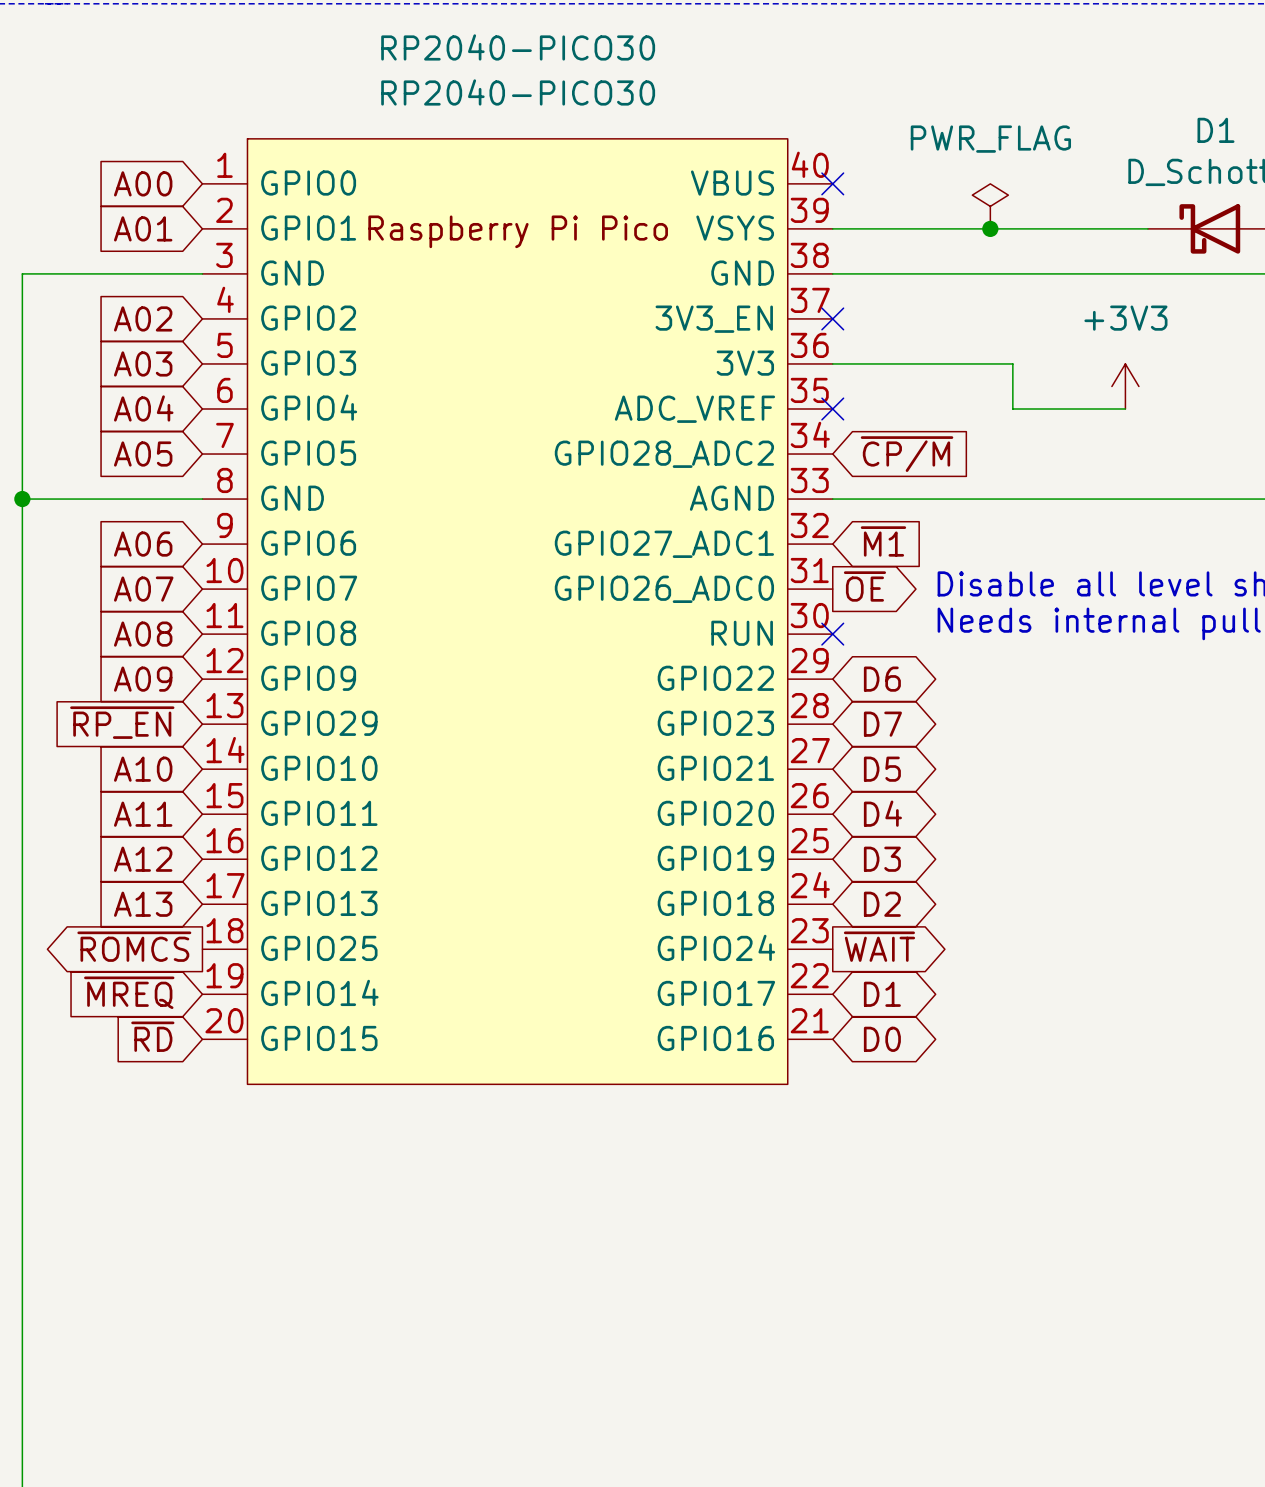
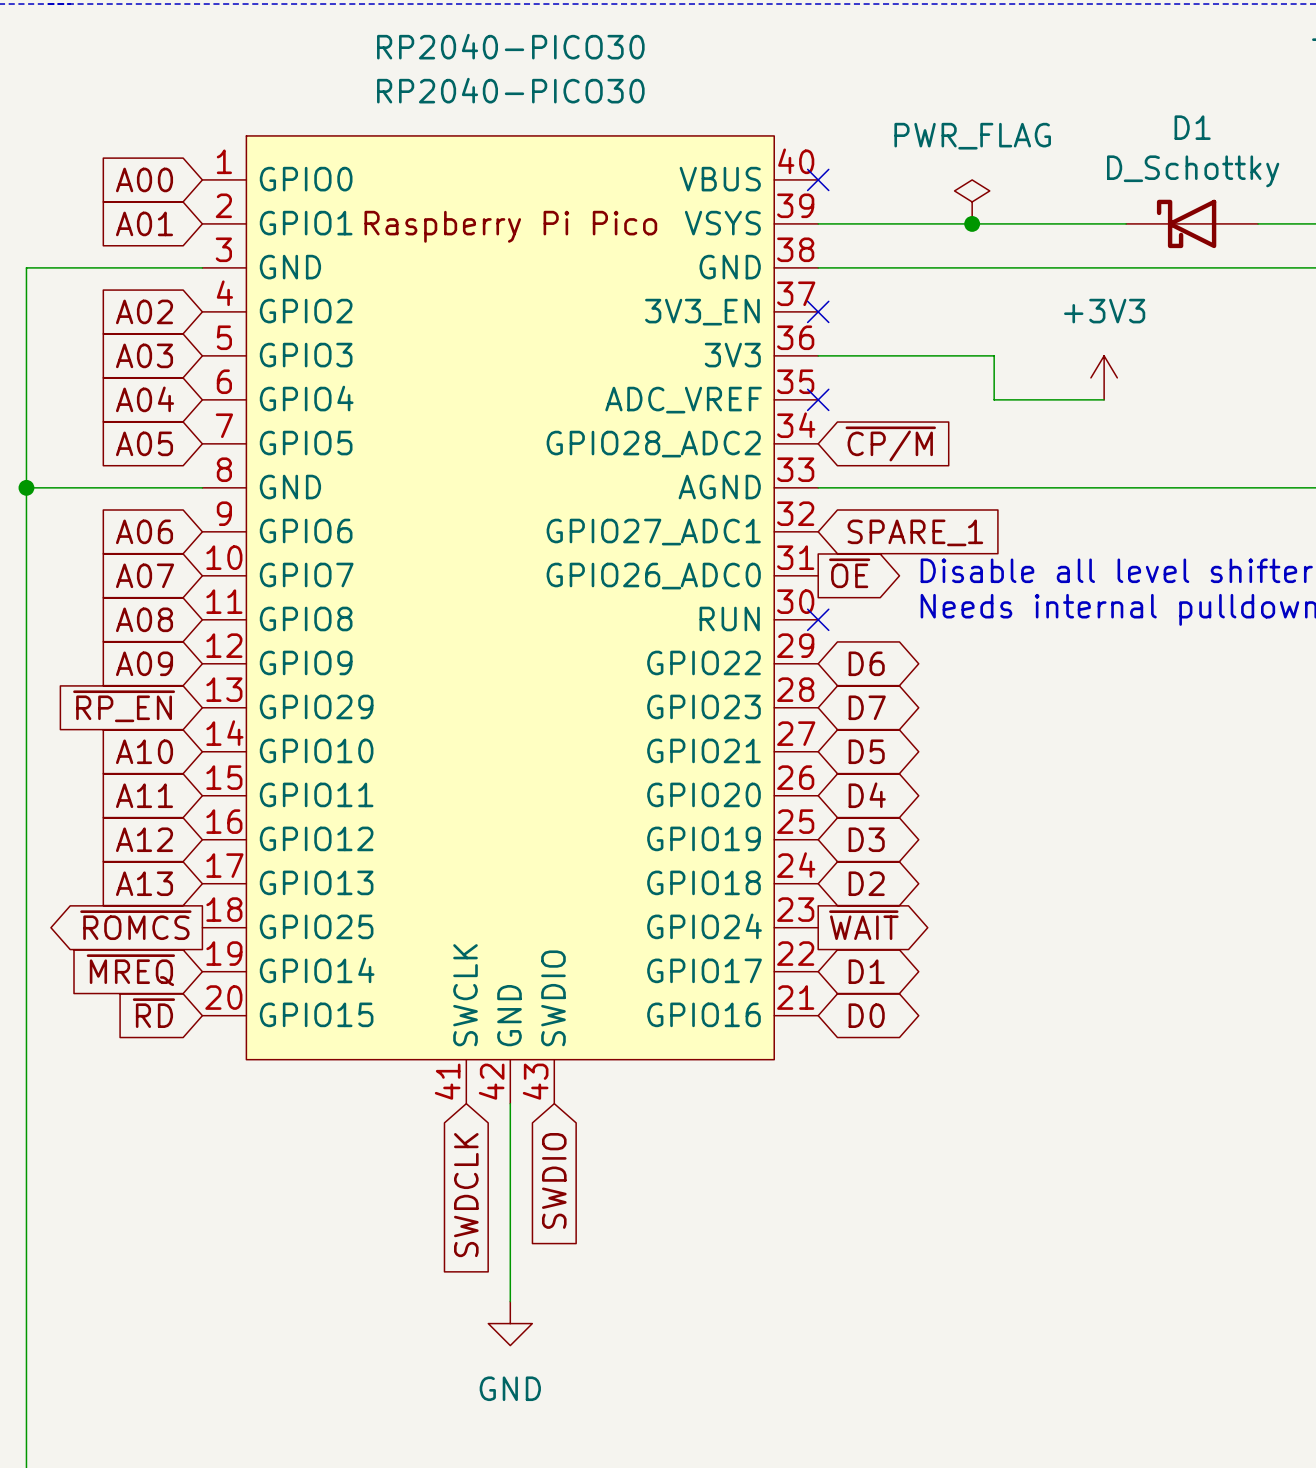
RP2040-PICO30 symbol: [202, 138, 833, 1085] -> [202, 135, 819, 1104]
global label: ~{M1} (883, 541) -> SPARE_1 (915, 532)
wire: none -> (510, 1103) (510, 1301)
global label: none -> SWDIO (554, 1180)
global label: none -> SWDCLK (466, 1195)
power symbol: none -> GND (510, 1323)

